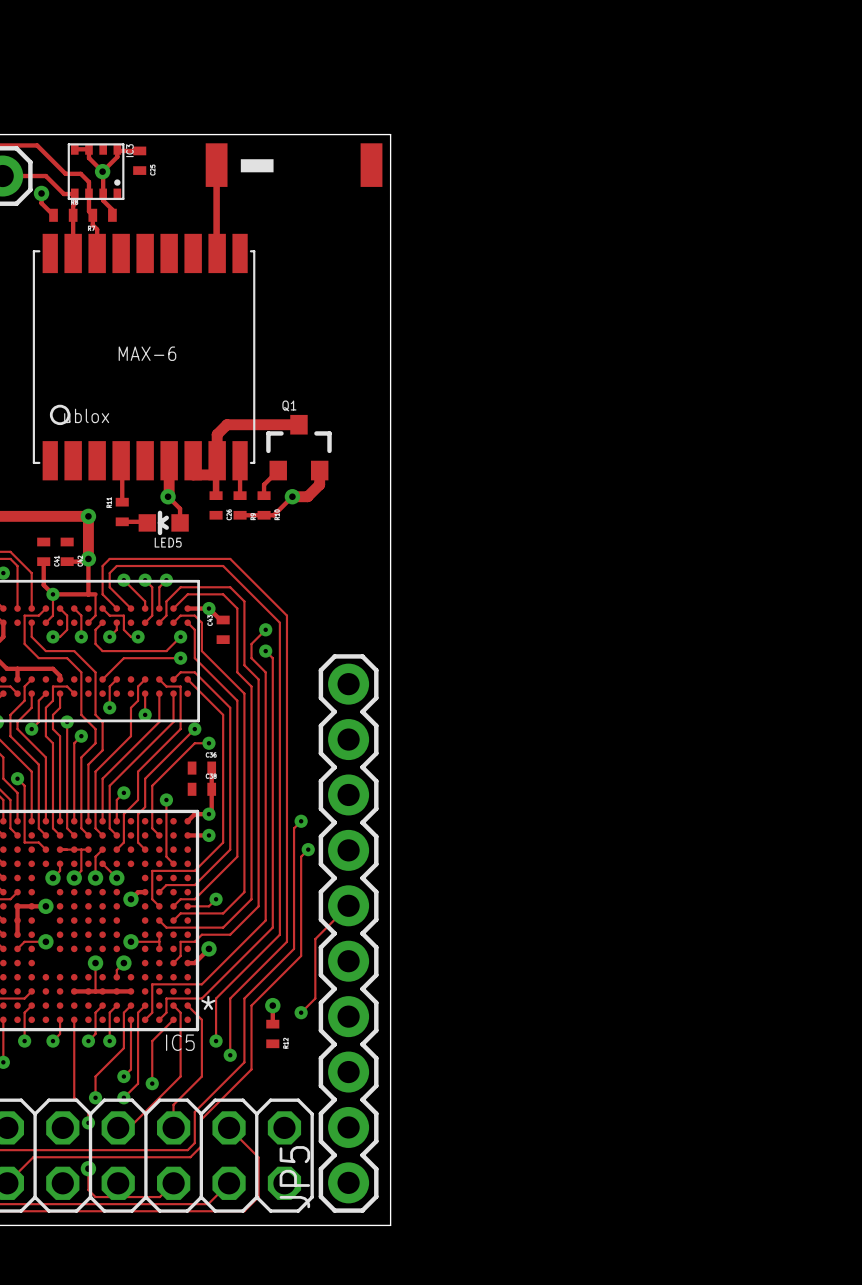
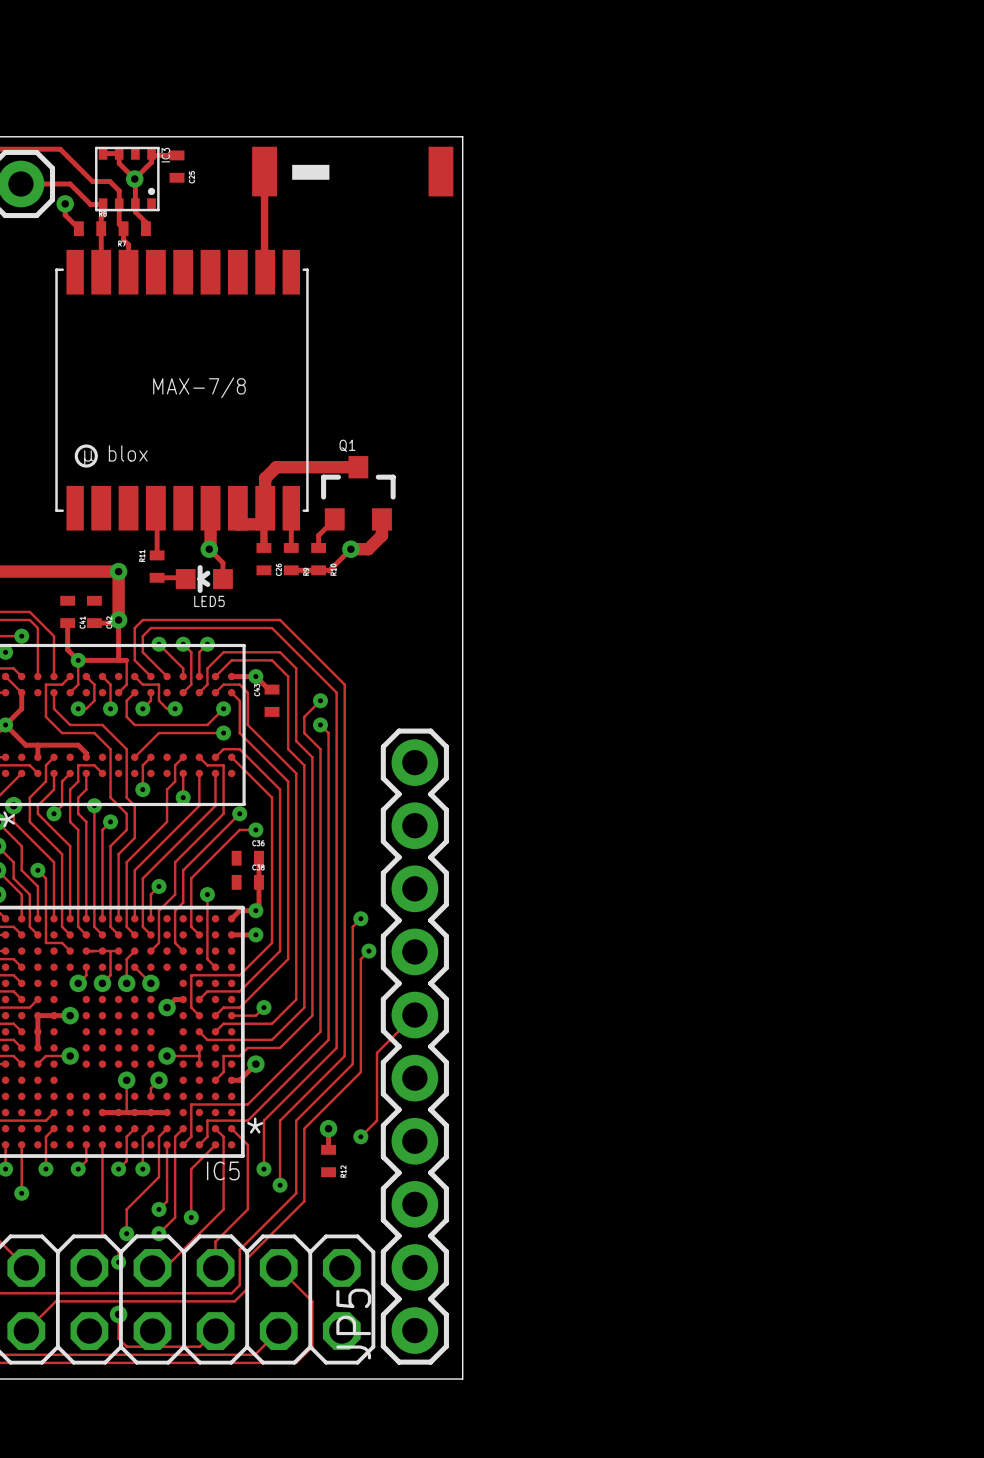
part text: MAX-6 (147, 353) -> MAX-7/8 (199, 387)
part text: none -> µ blox (115, 455)
part text: ublox (86, 415) -> none

